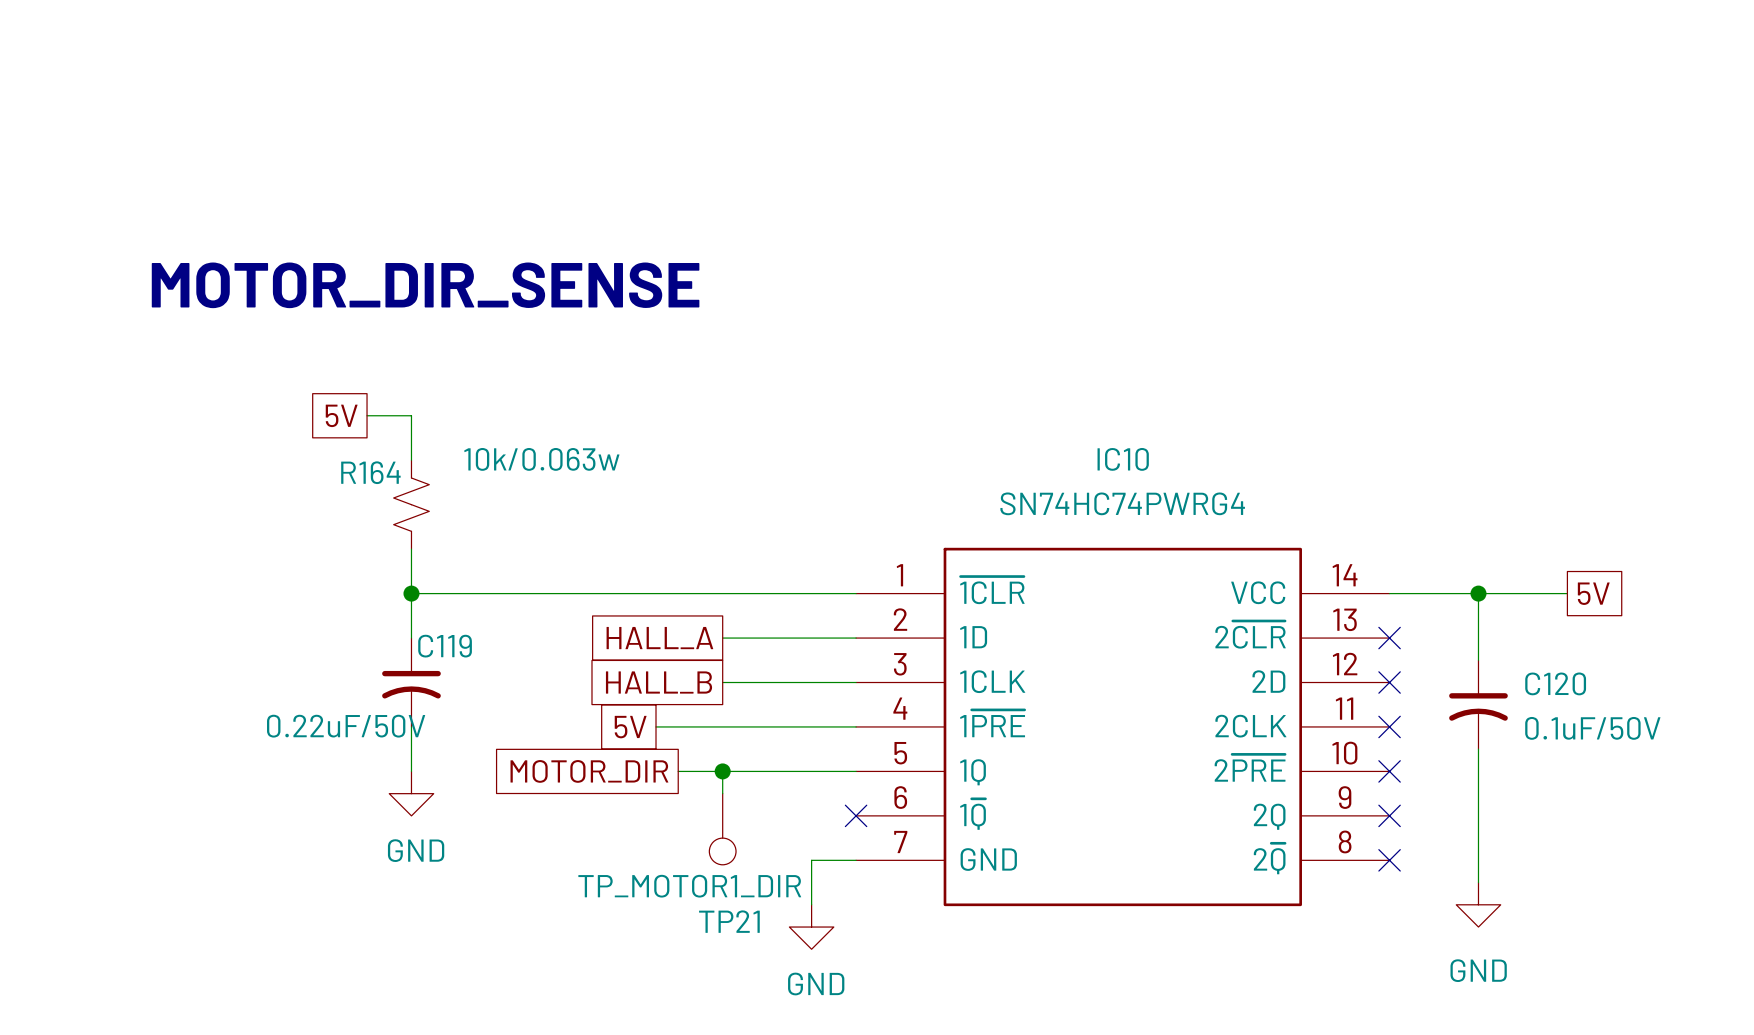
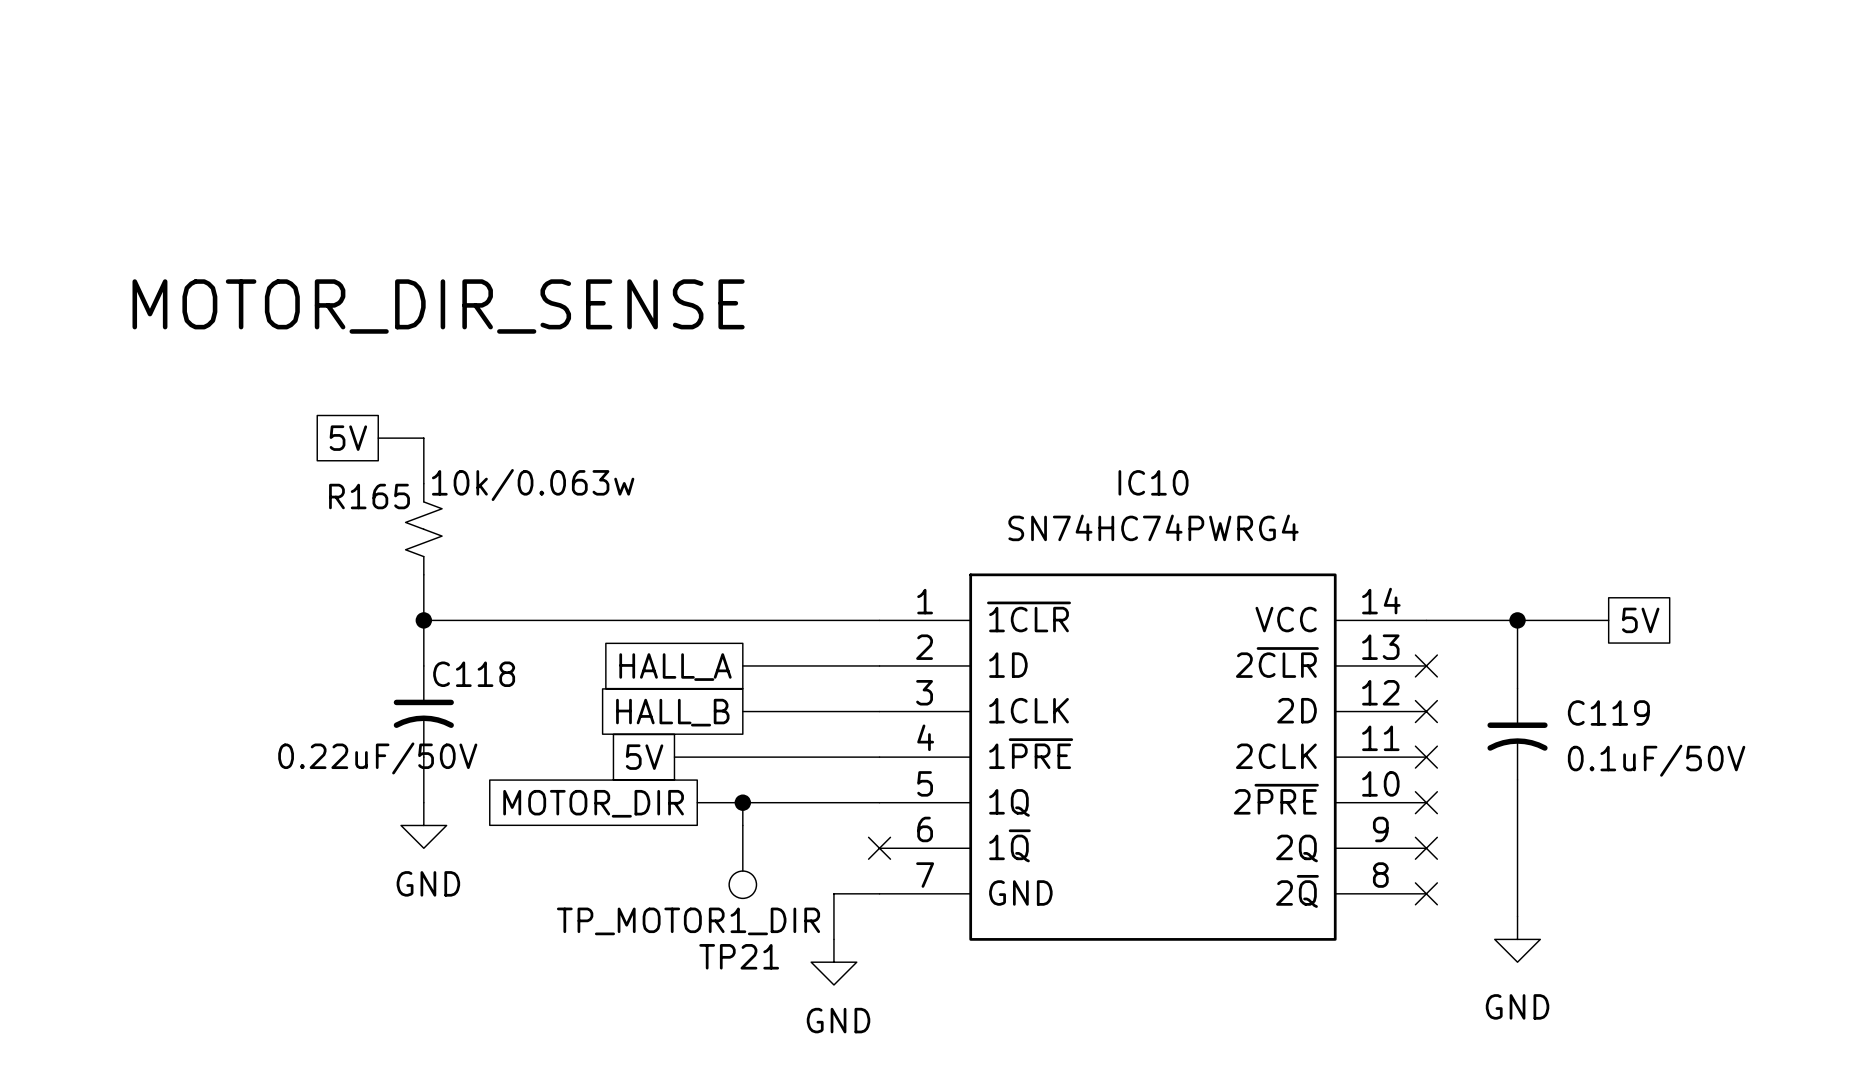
R164 name: R164 (370, 472) -> R165 (369, 496)
C119 name: C119 (445, 646) -> C118 (474, 674)
C120 name: C120 (1555, 683) -> C119 (1608, 712)

